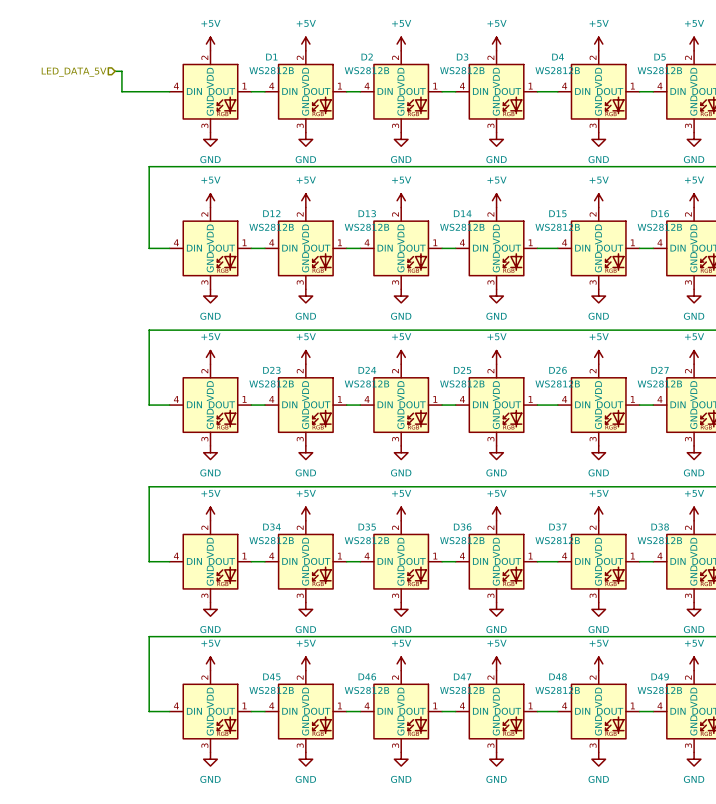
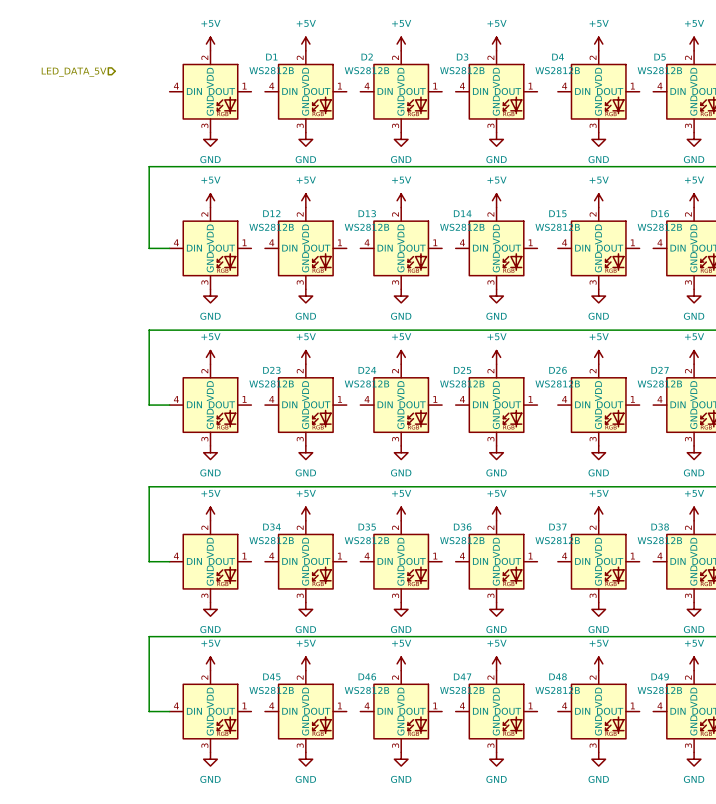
wire: (115, 71) (121, 71) (121, 91) (169, 91) -> none
wire: (251, 91) (264, 91) -> none
wire: (346, 91) (360, 91) -> none
wire: (442, 91) (455, 91) -> none
wire: (537, 91) (557, 91) -> none
wire: (639, 91) (653, 91) -> none
wire: (251, 248) (264, 248) -> none
wire: (346, 248) (360, 248) -> none
wire: (442, 248) (455, 248) -> none
wire: (537, 248) (557, 248) -> none
wire: (639, 248) (653, 248) -> none
wire: (251, 405) (264, 405) -> none
wire: (346, 405) (360, 405) -> none
wire: (442, 405) (455, 405) -> none
wire: (537, 405) (557, 405) -> none
wire: (639, 405) (653, 405) -> none
wire: (251, 561) (264, 561) -> none
wire: (346, 561) (360, 561) -> none
wire: (442, 561) (455, 561) -> none
wire: (537, 561) (557, 561) -> none
wire: (639, 561) (653, 561) -> none
wire: (251, 711) (264, 711) -> none
wire: (346, 711) (360, 711) -> none
wire: (442, 711) (455, 711) -> none
wire: (537, 711) (557, 711) -> none
wire: (639, 711) (653, 711) -> none

